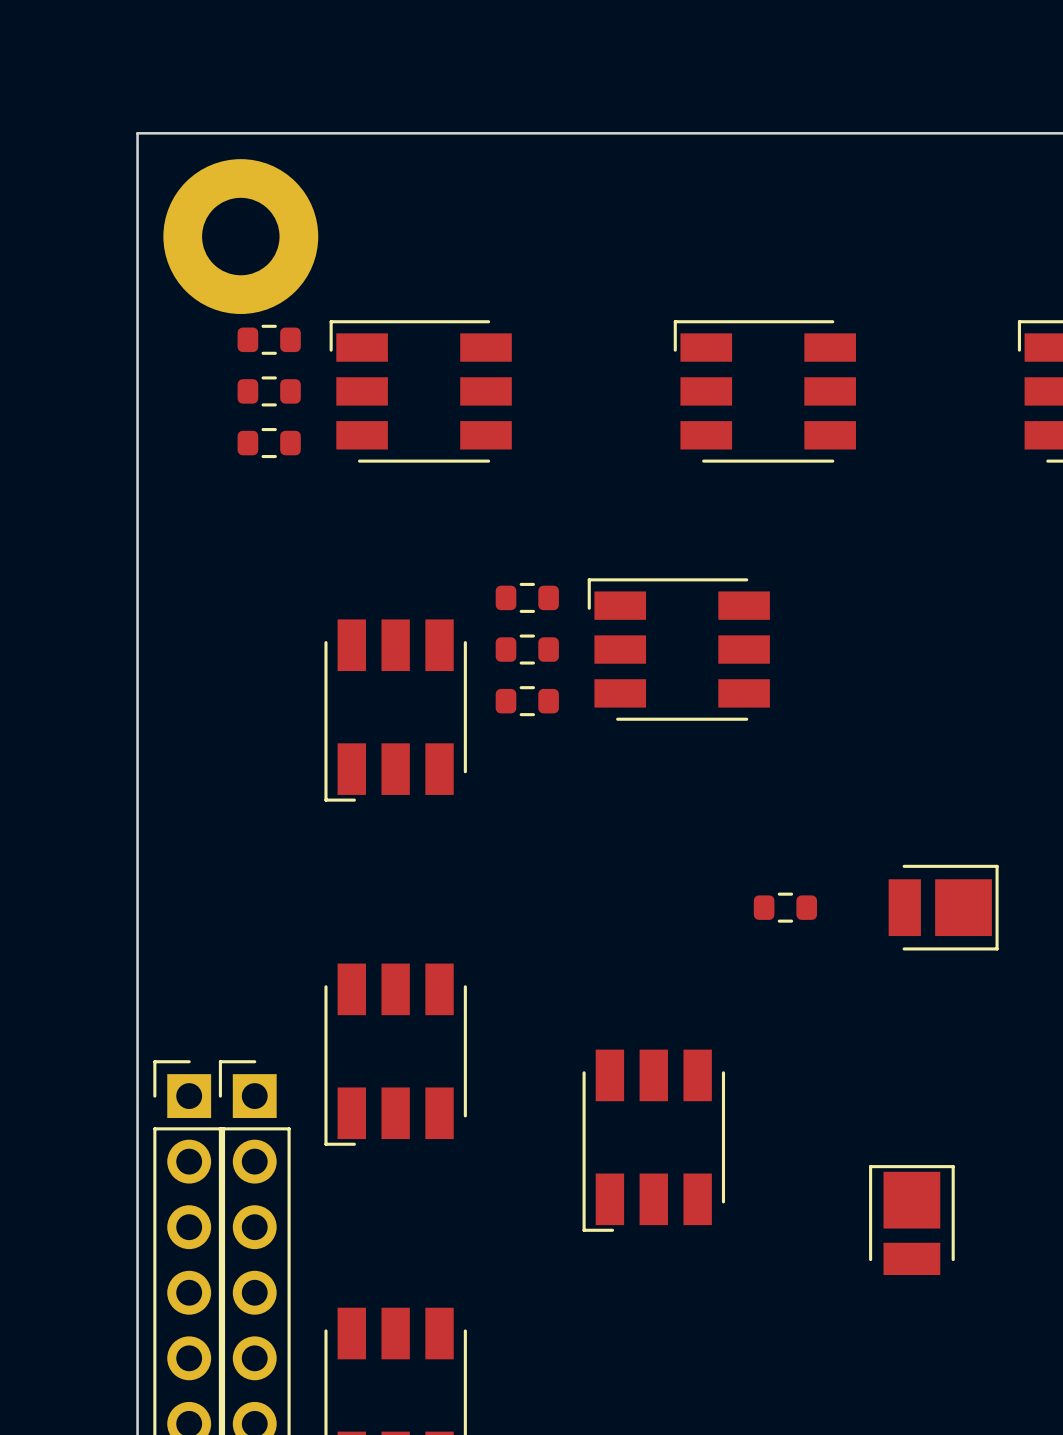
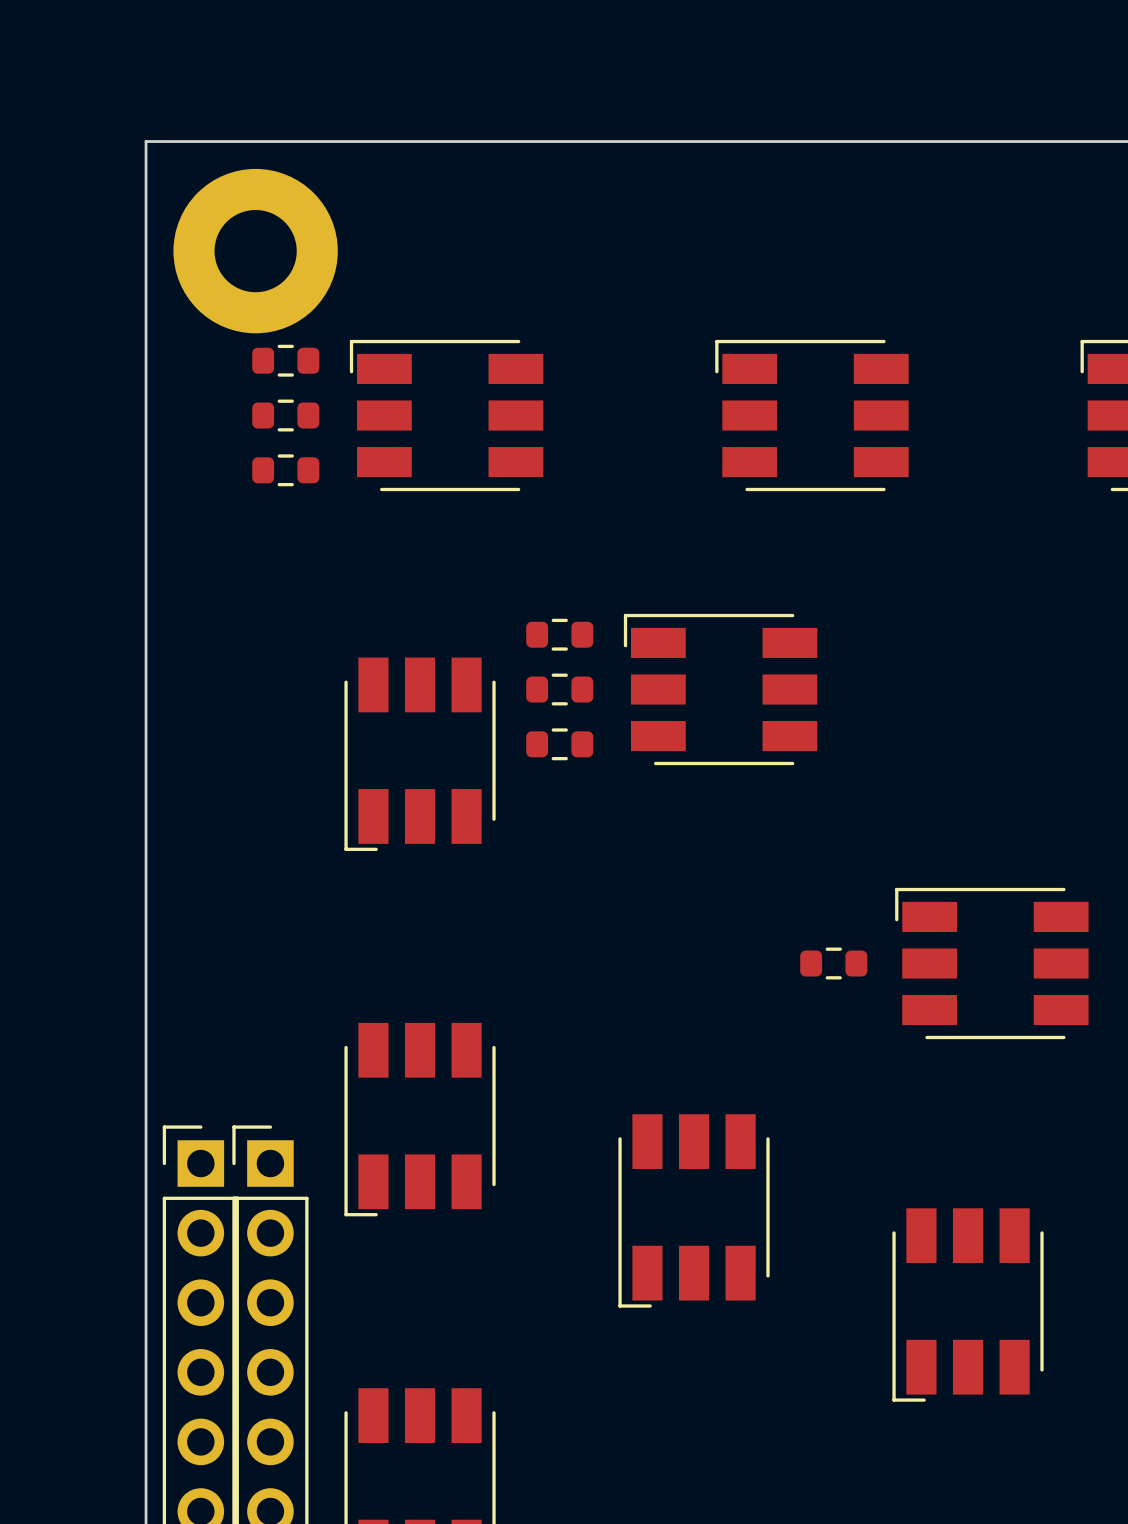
part footprint: [888, 864, 999, 951] -> [895, 887, 1089, 1040]
part footprint: [869, 1165, 955, 1276] -> [892, 1208, 1044, 1402]

